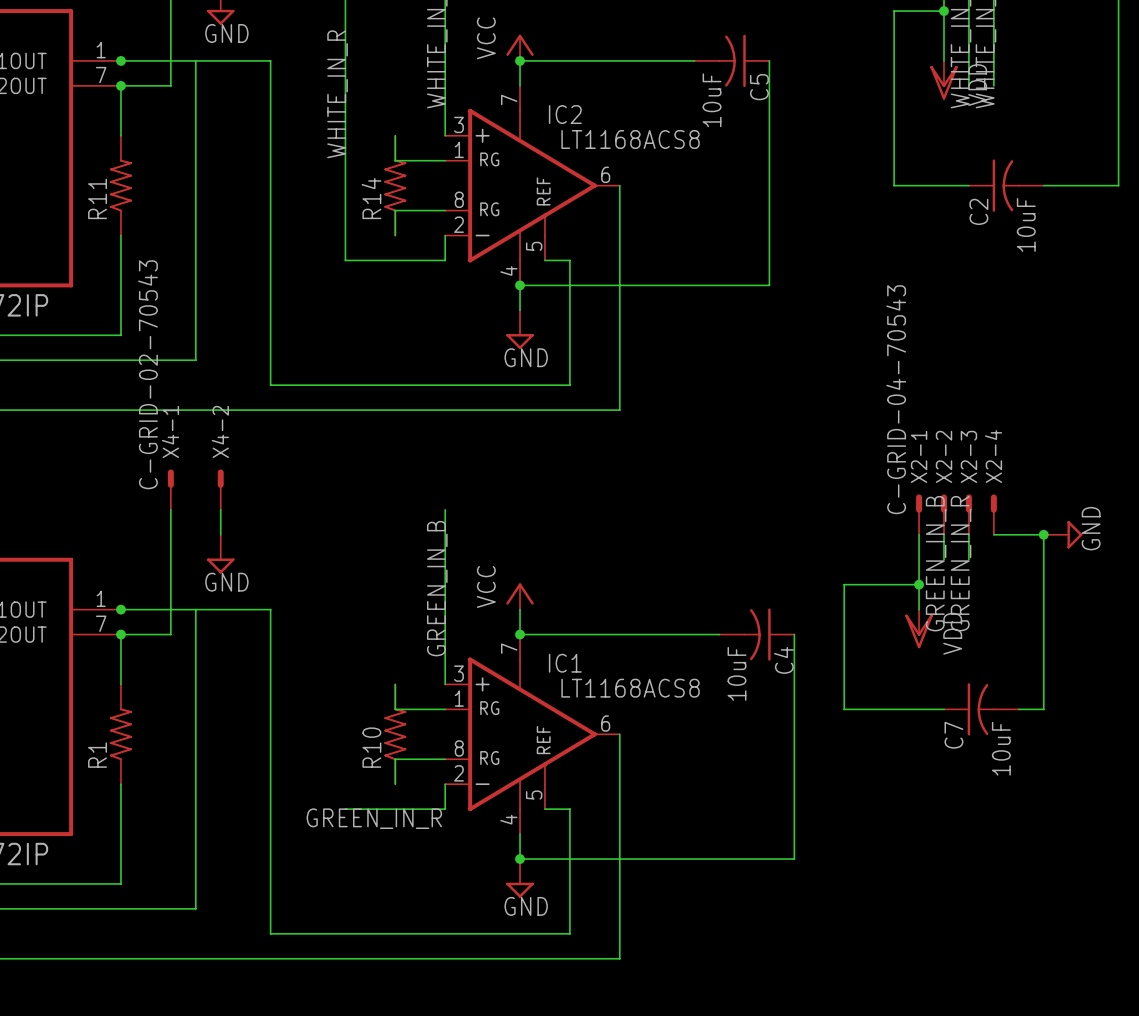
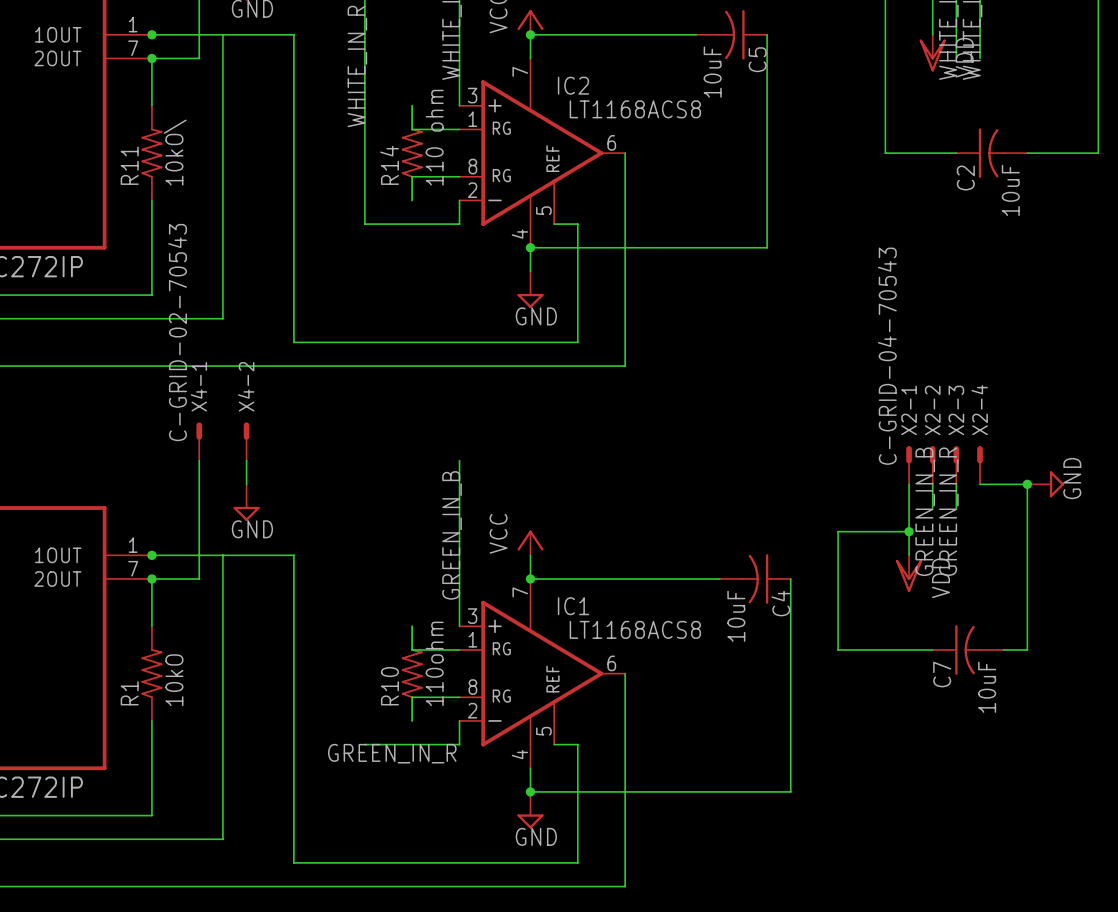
R14 value: none -> 110 ohm (434, 137)
R11 value: none -> 10kO\ (175, 152)
R10 value: none -> 110ohm (434, 663)
R1 value: none -> 10kO (174, 680)

